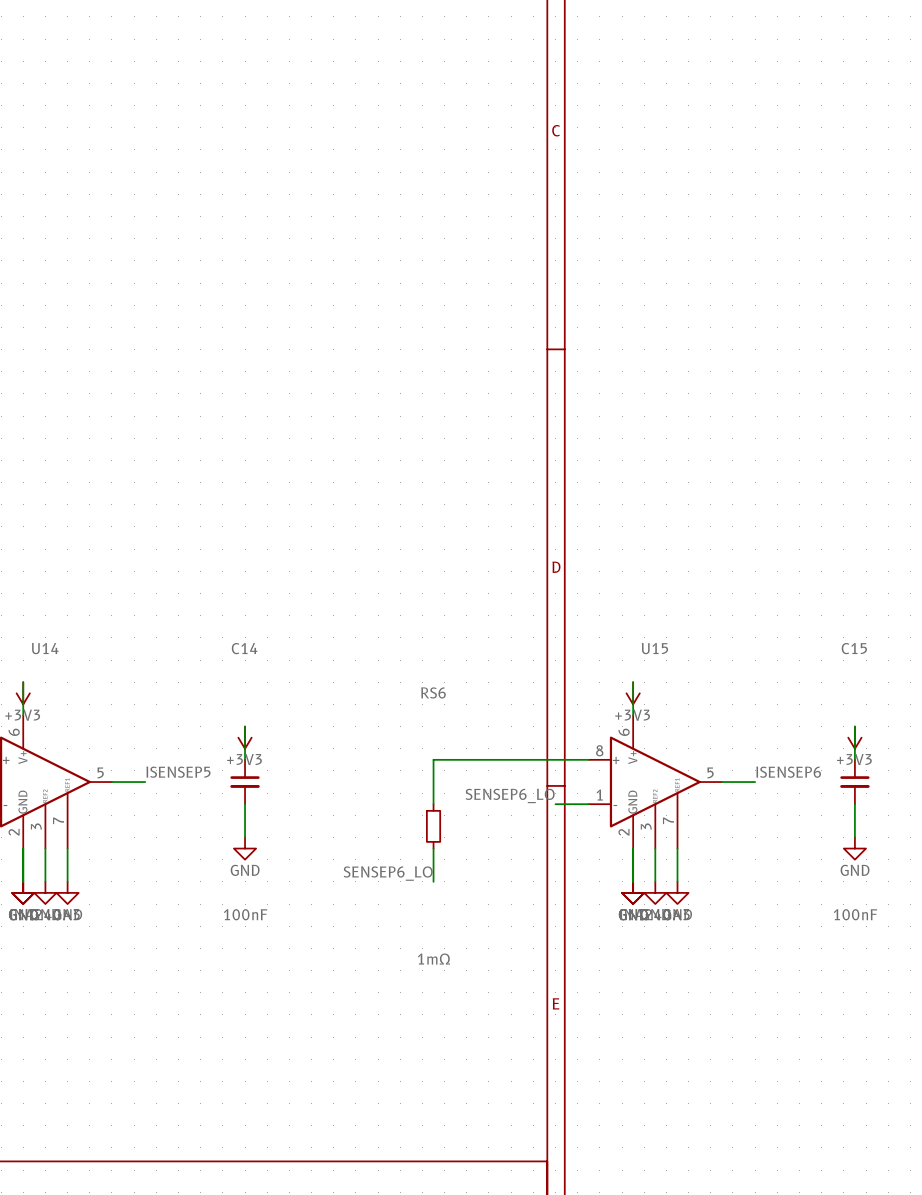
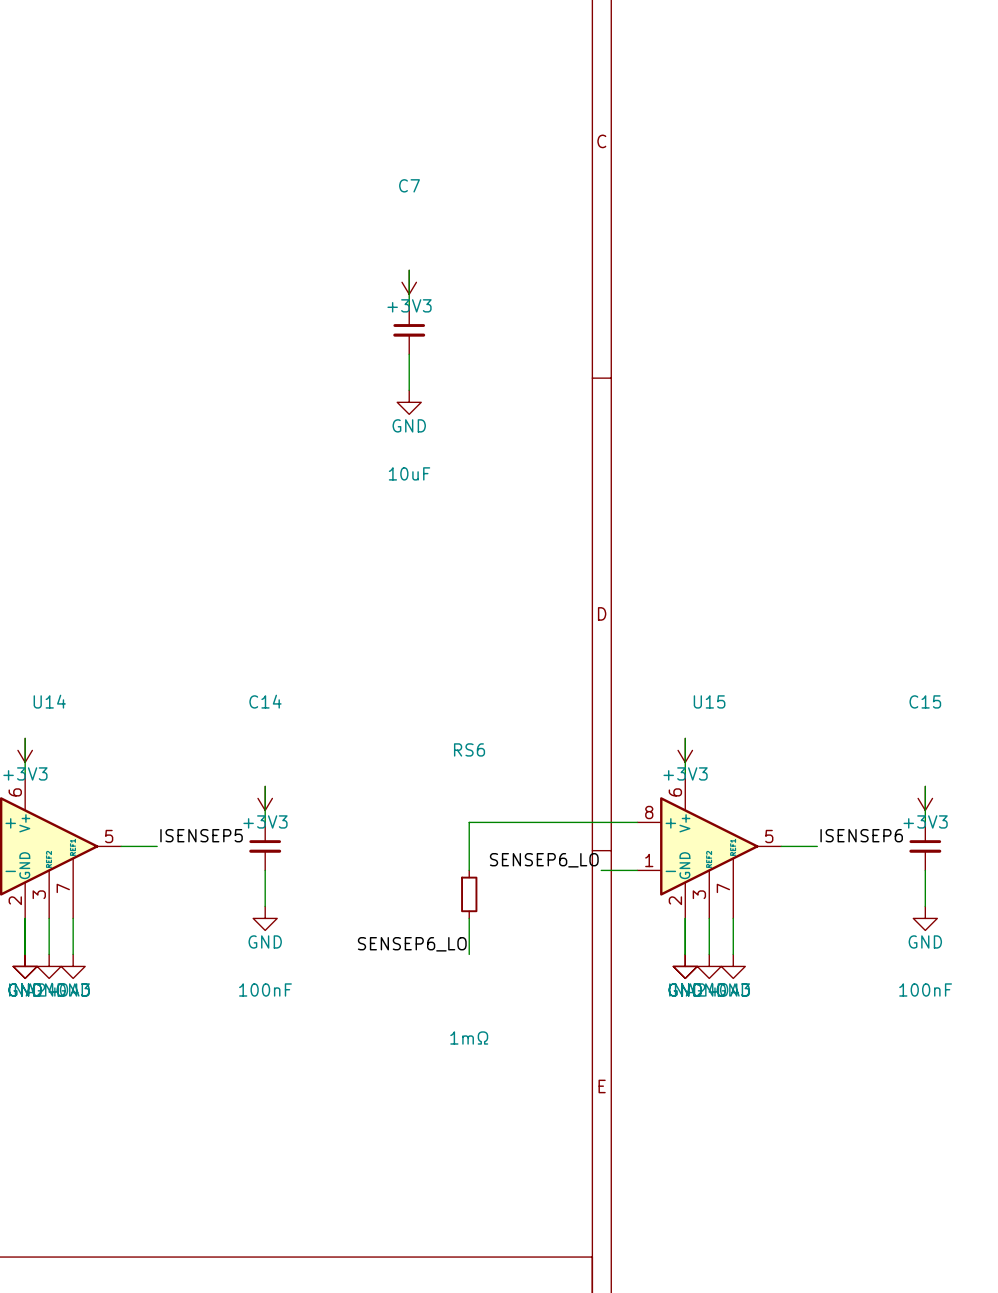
wire: none -> (409, 270) (409, 306)
power symbol: none -> +3V3 (409, 282)
C7: none -> 10uF (409, 330)
wire: none -> (409, 354) (409, 390)
power symbol: none -> GND (409, 402)

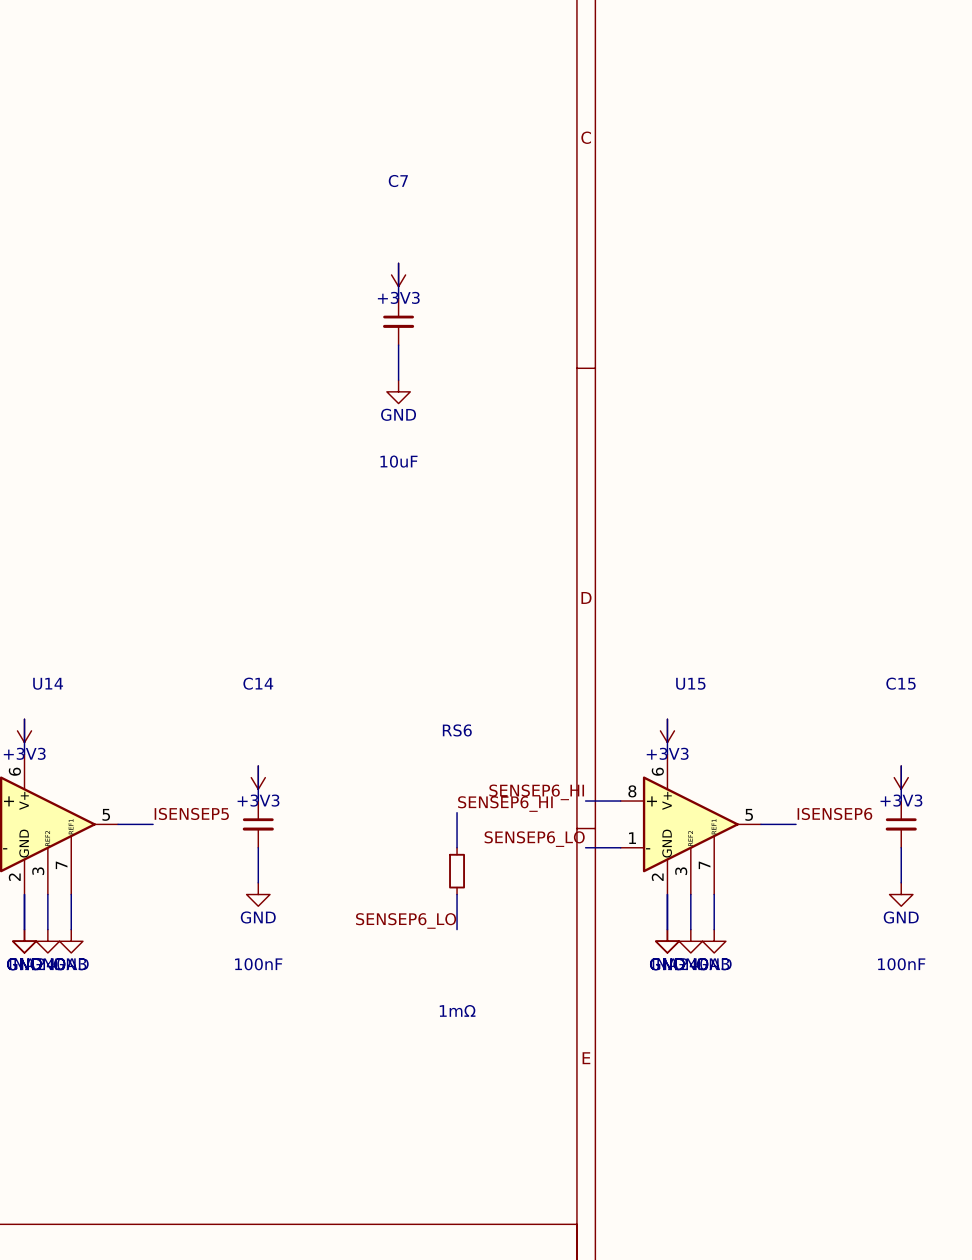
label: none -> SENSEP6_HI (536, 792)
wire: (601, 822) (469, 822) (469, 834) -> none
label: none -> SENSEP6_HI (505, 804)

